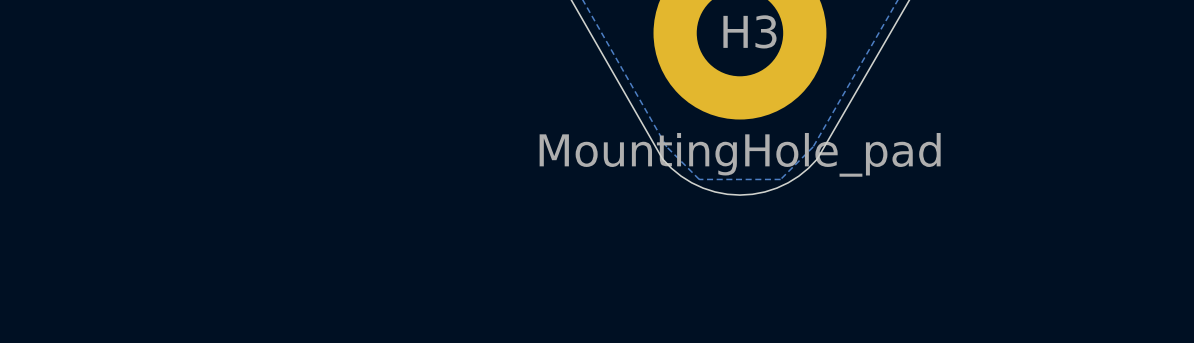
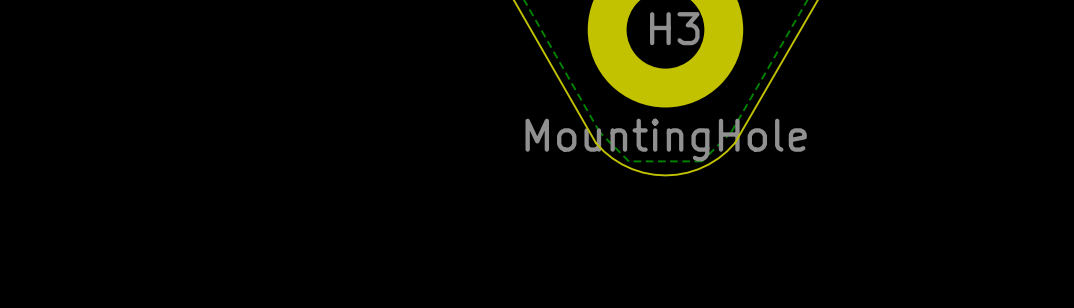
H3 value: MountingHole_pad (740, 154) -> MountingHole (666, 140)

